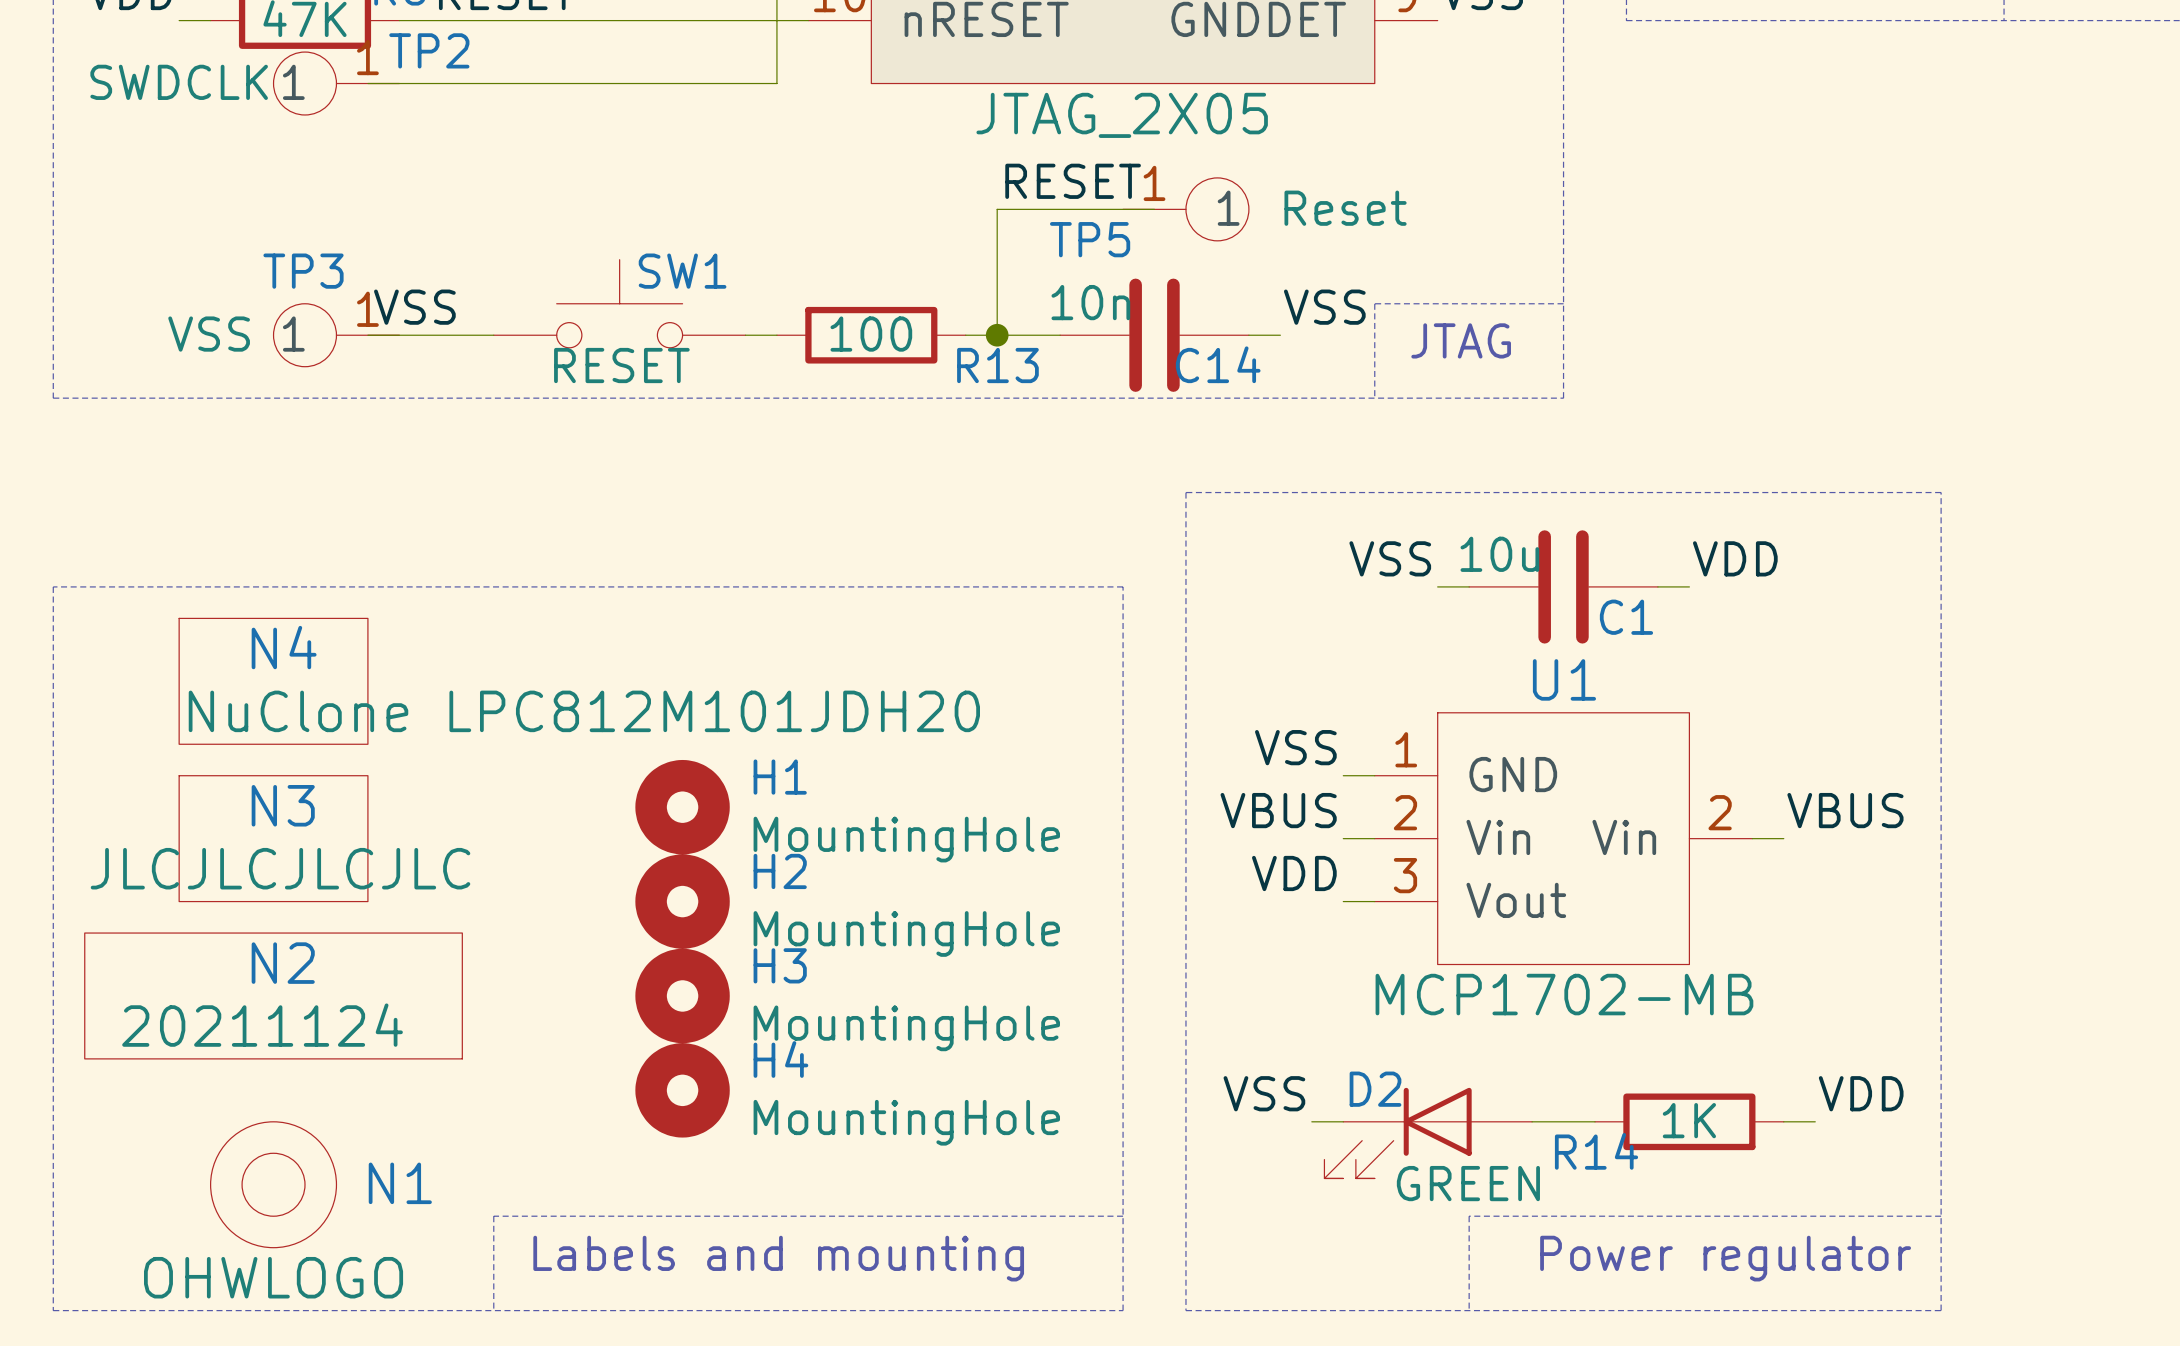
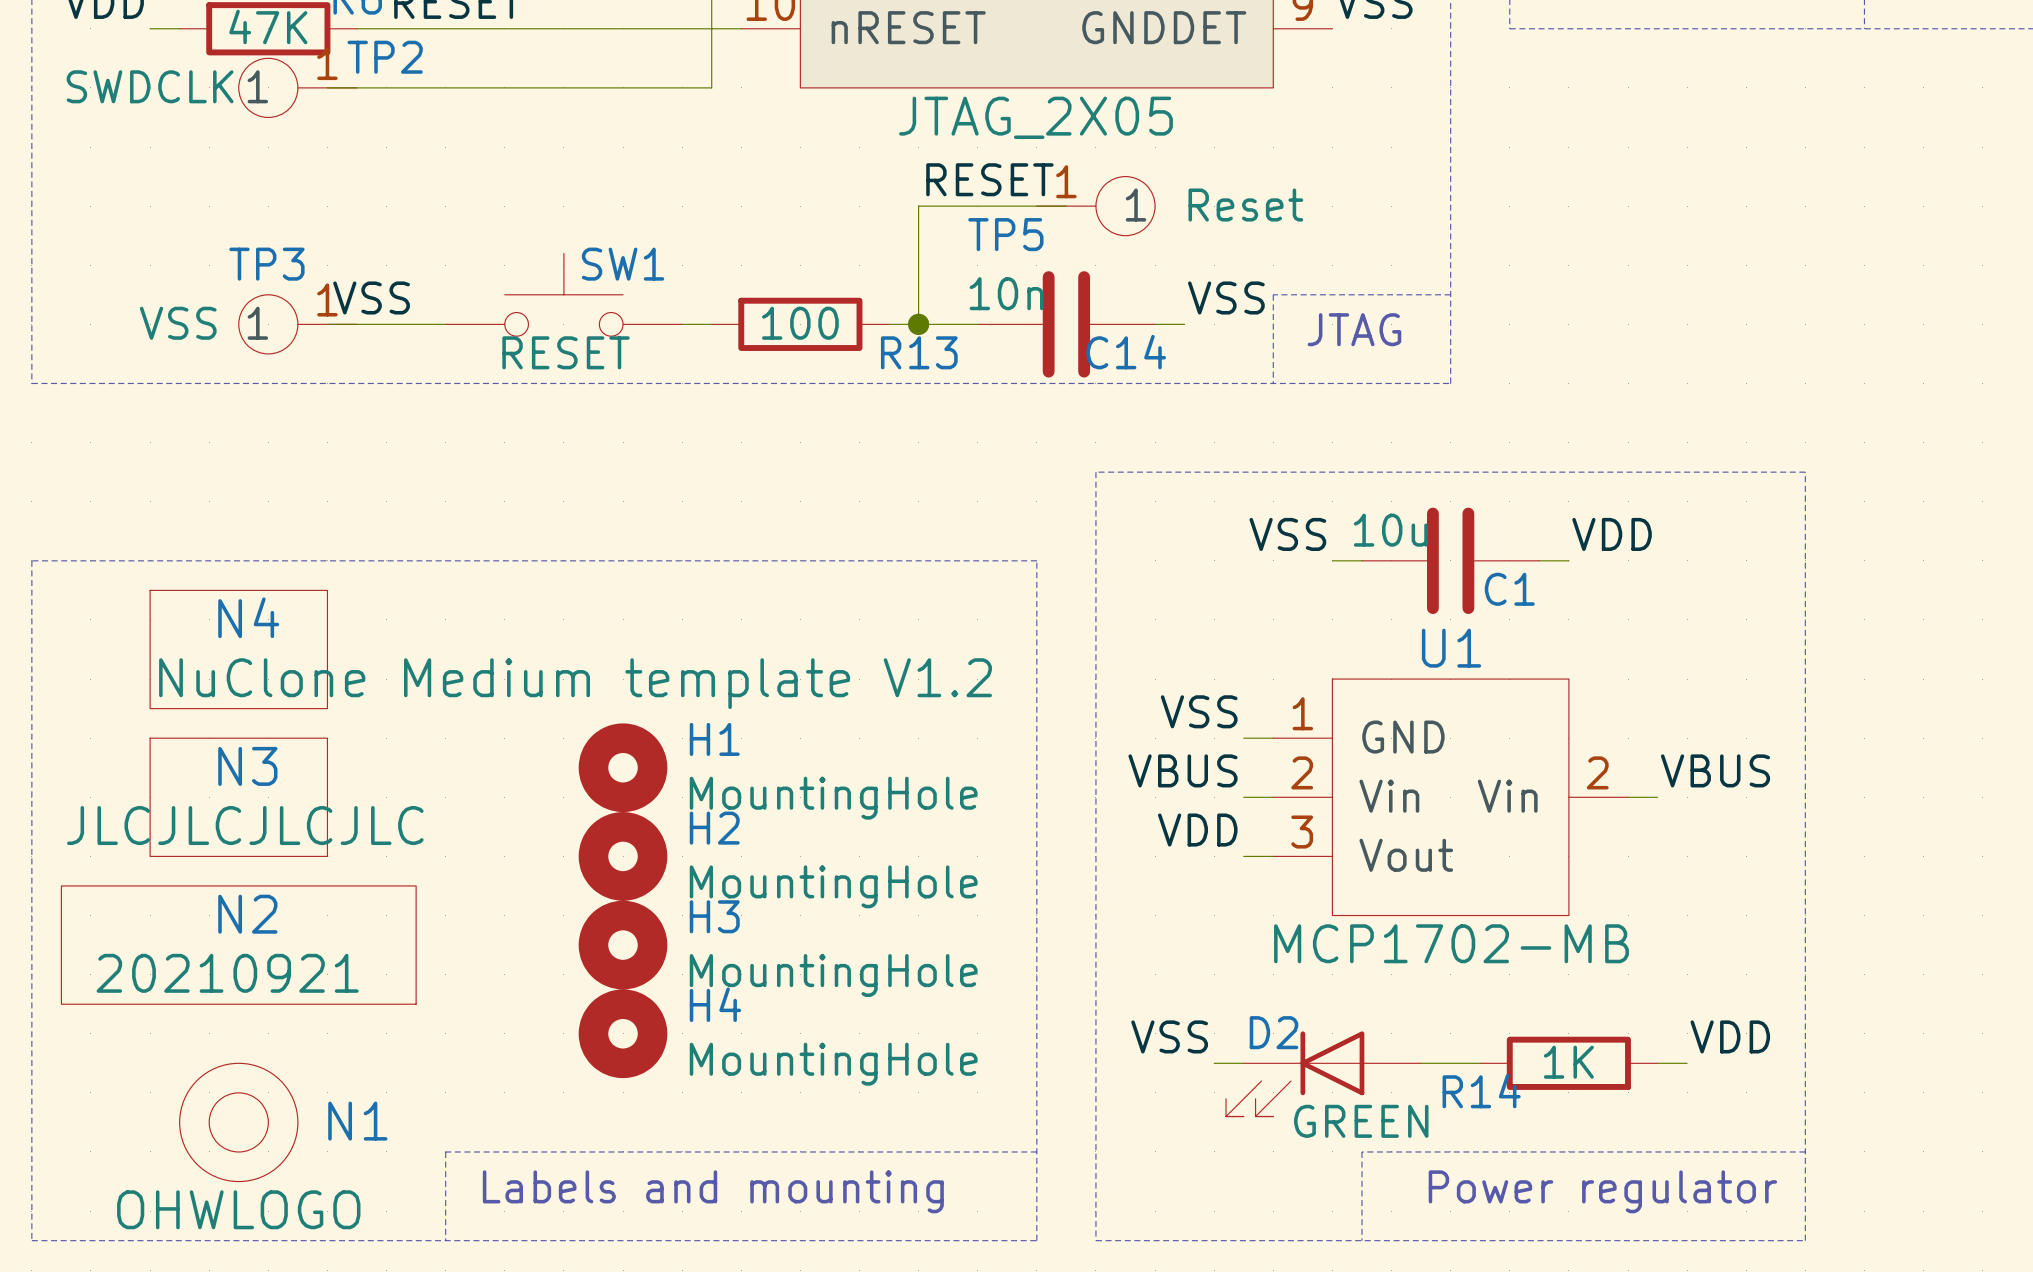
N4 value: NuClone LPC812M101JDH20 (584, 711) -> NuClone Medium template V1.2 (575, 683)
N2 value: 20211124 (262, 1025) -> 20210921 (227, 973)

